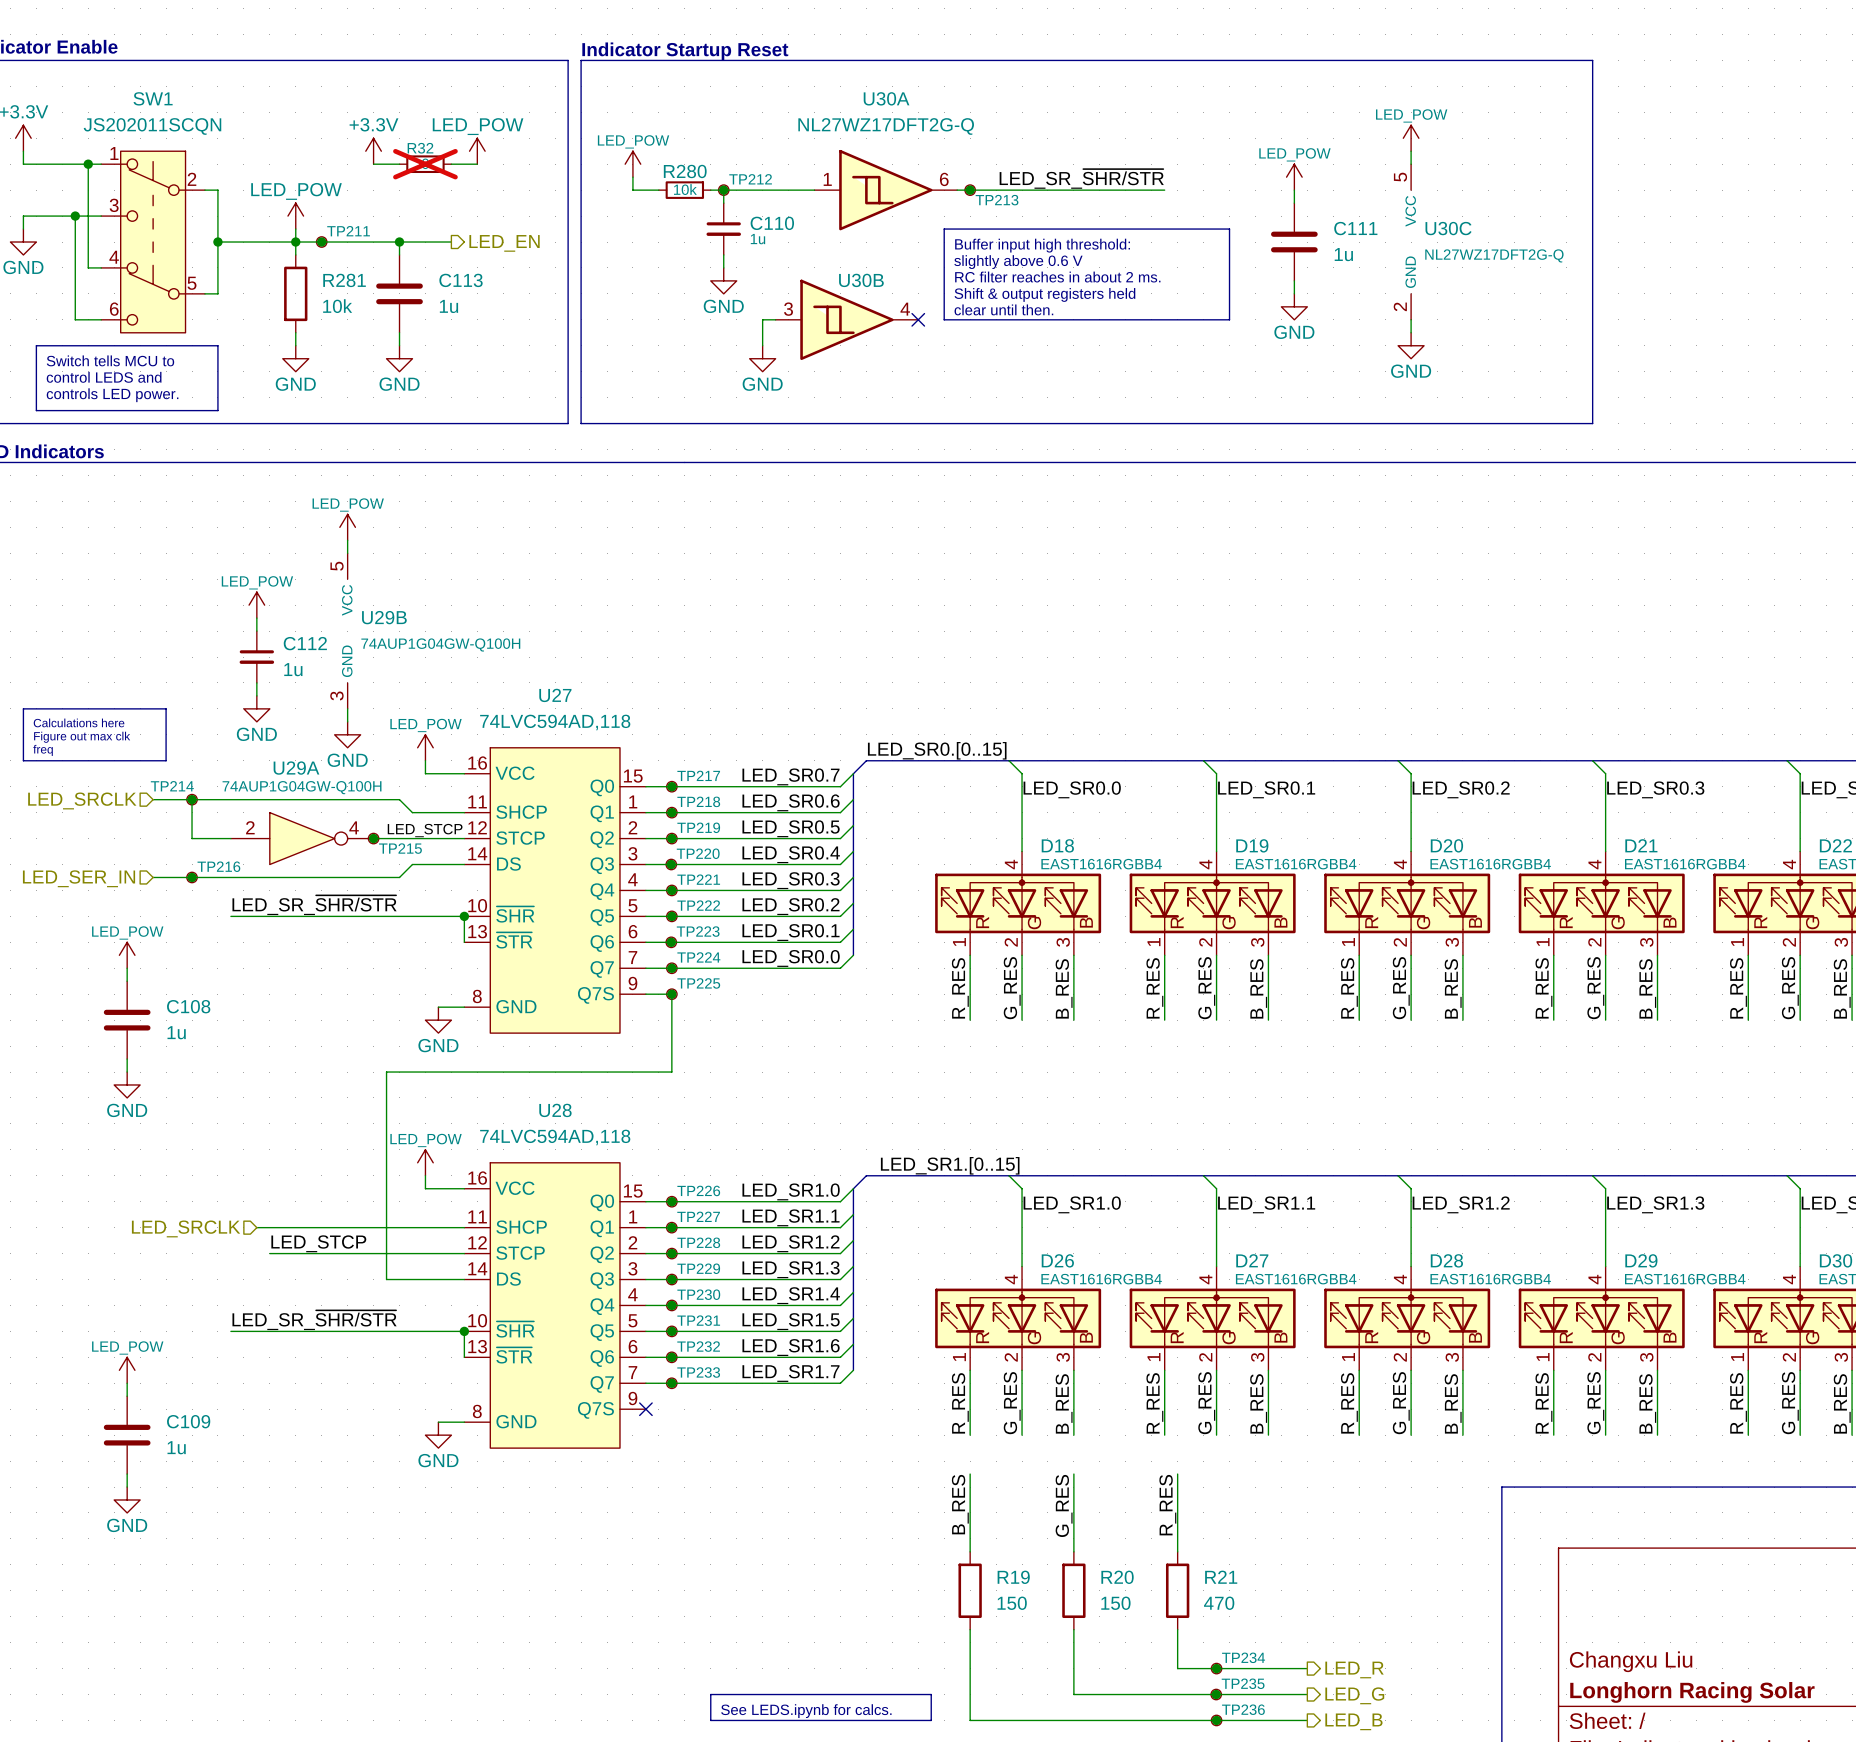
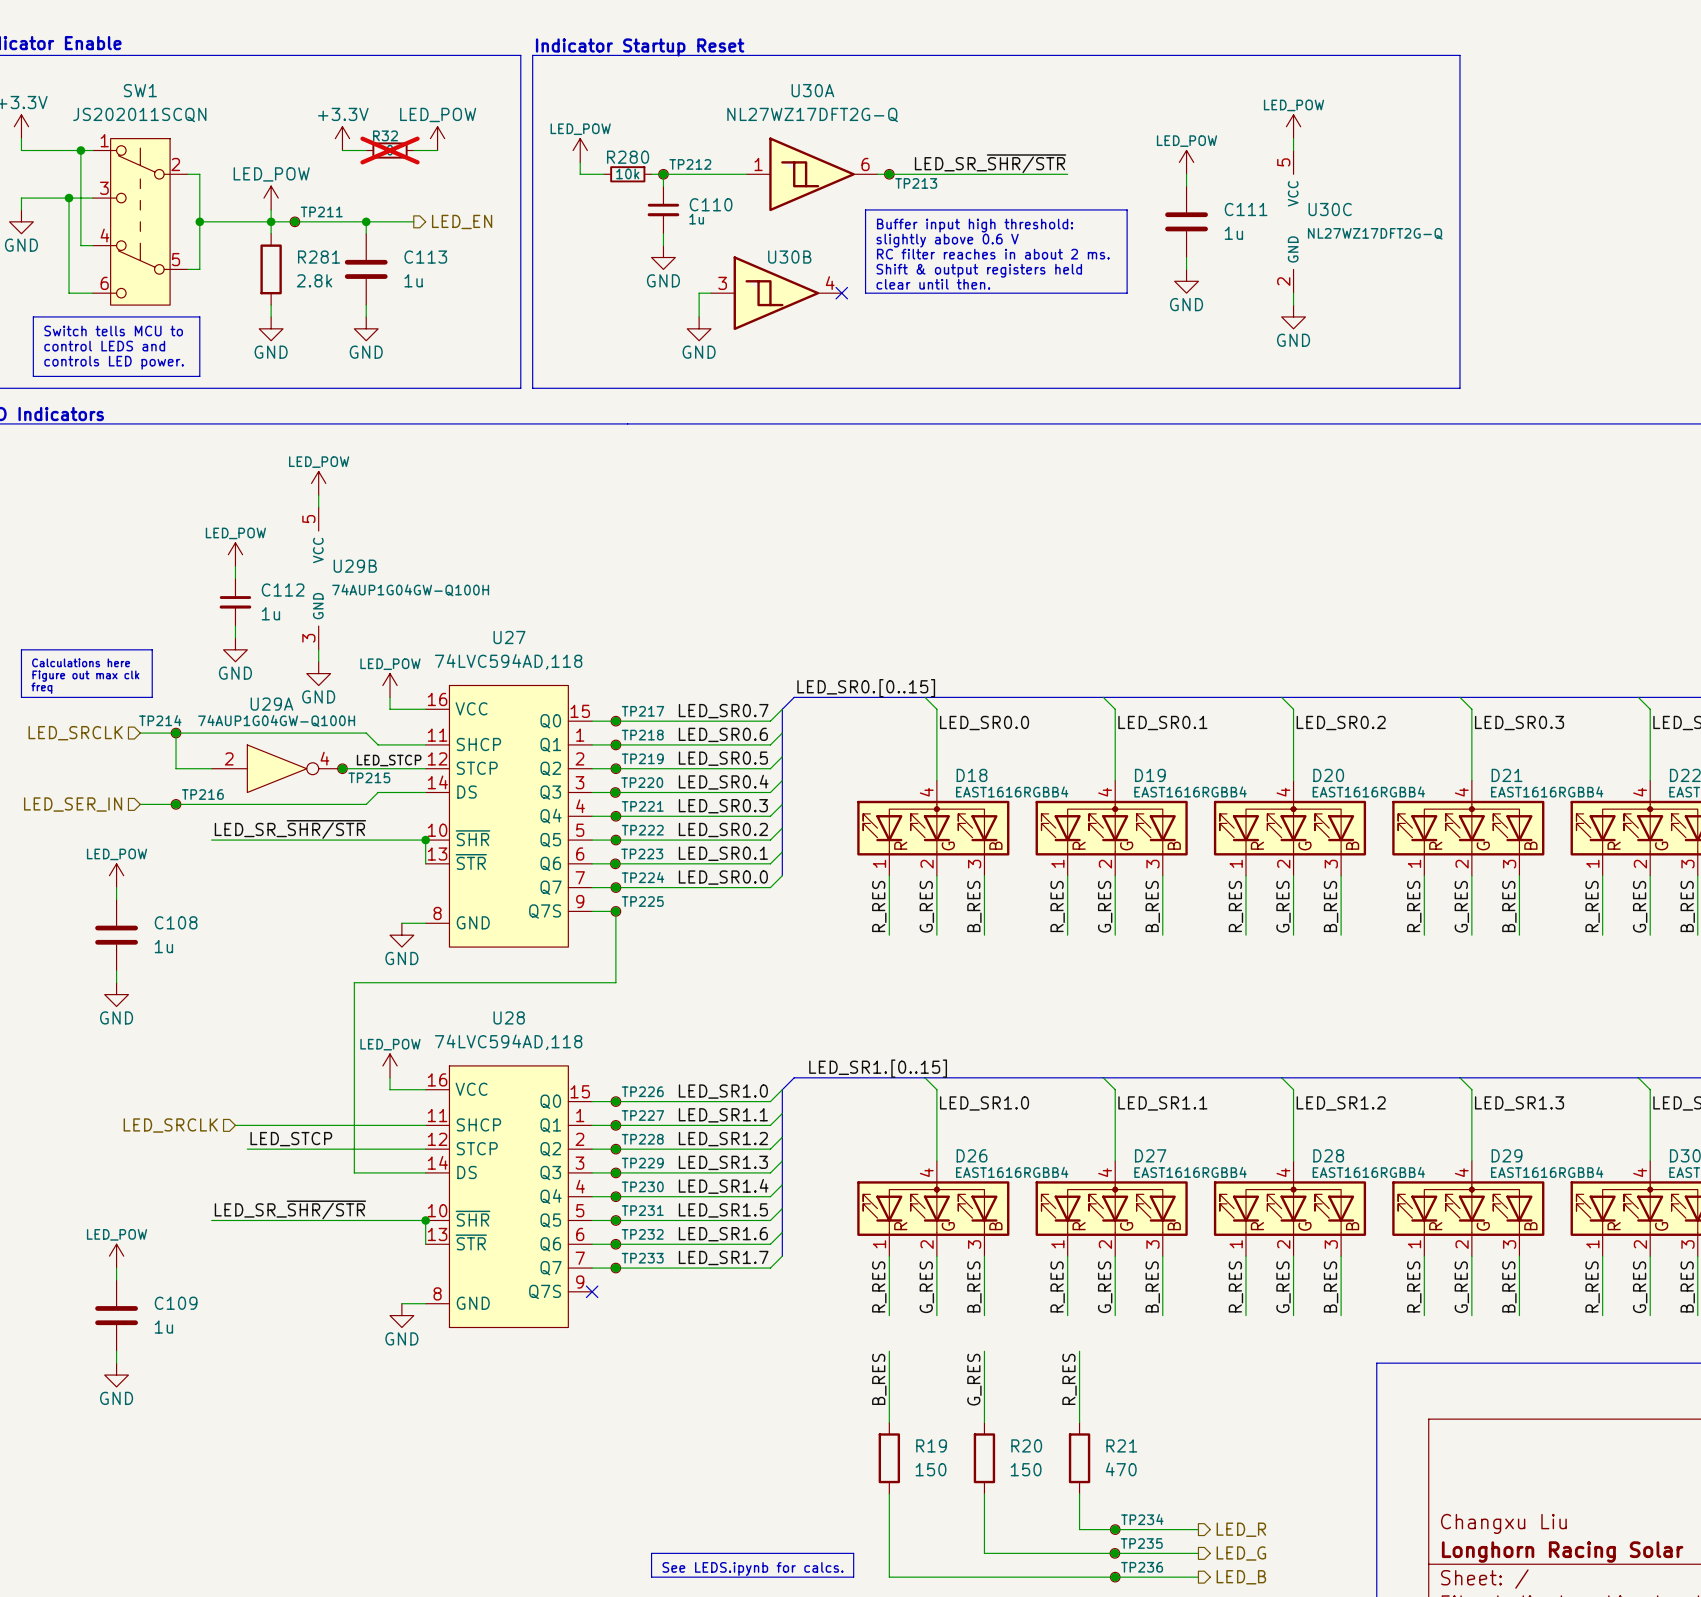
R281 value: 10k (337, 306) -> 2.8k (314, 280)

